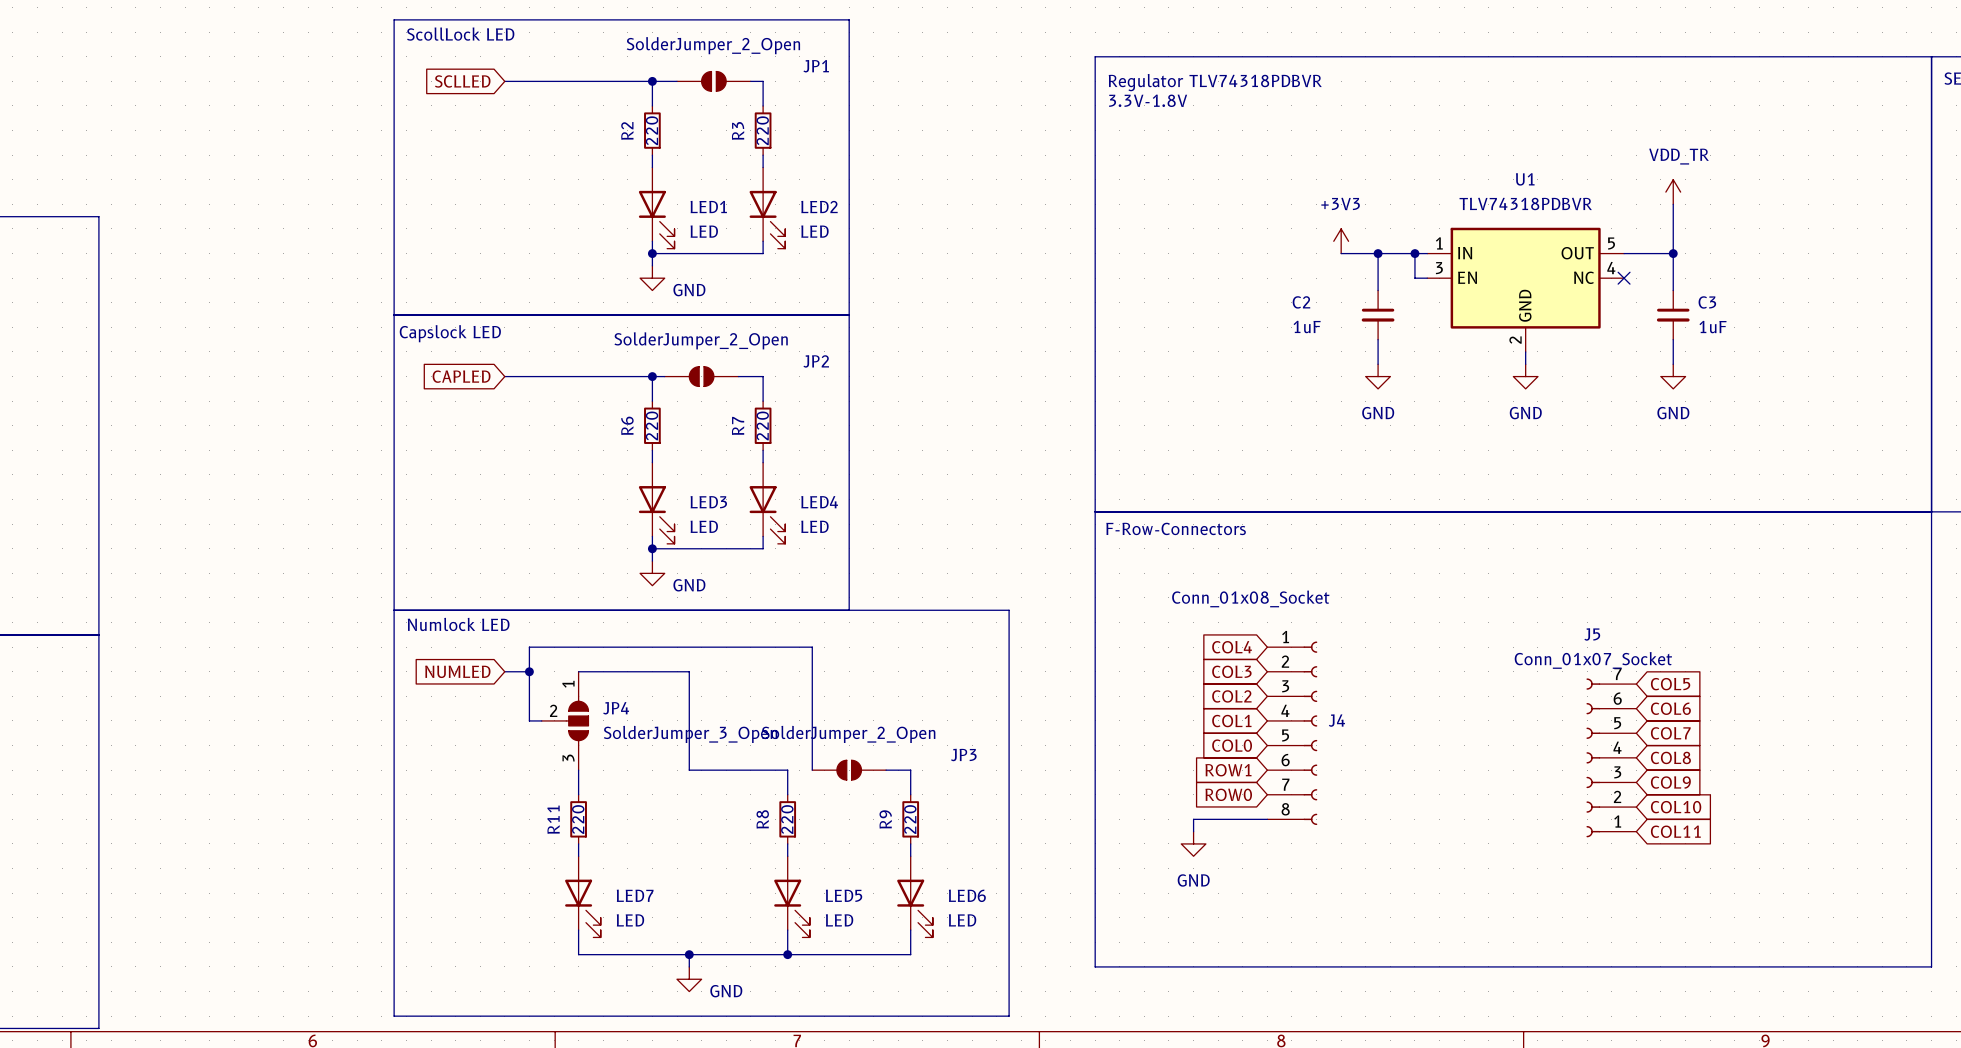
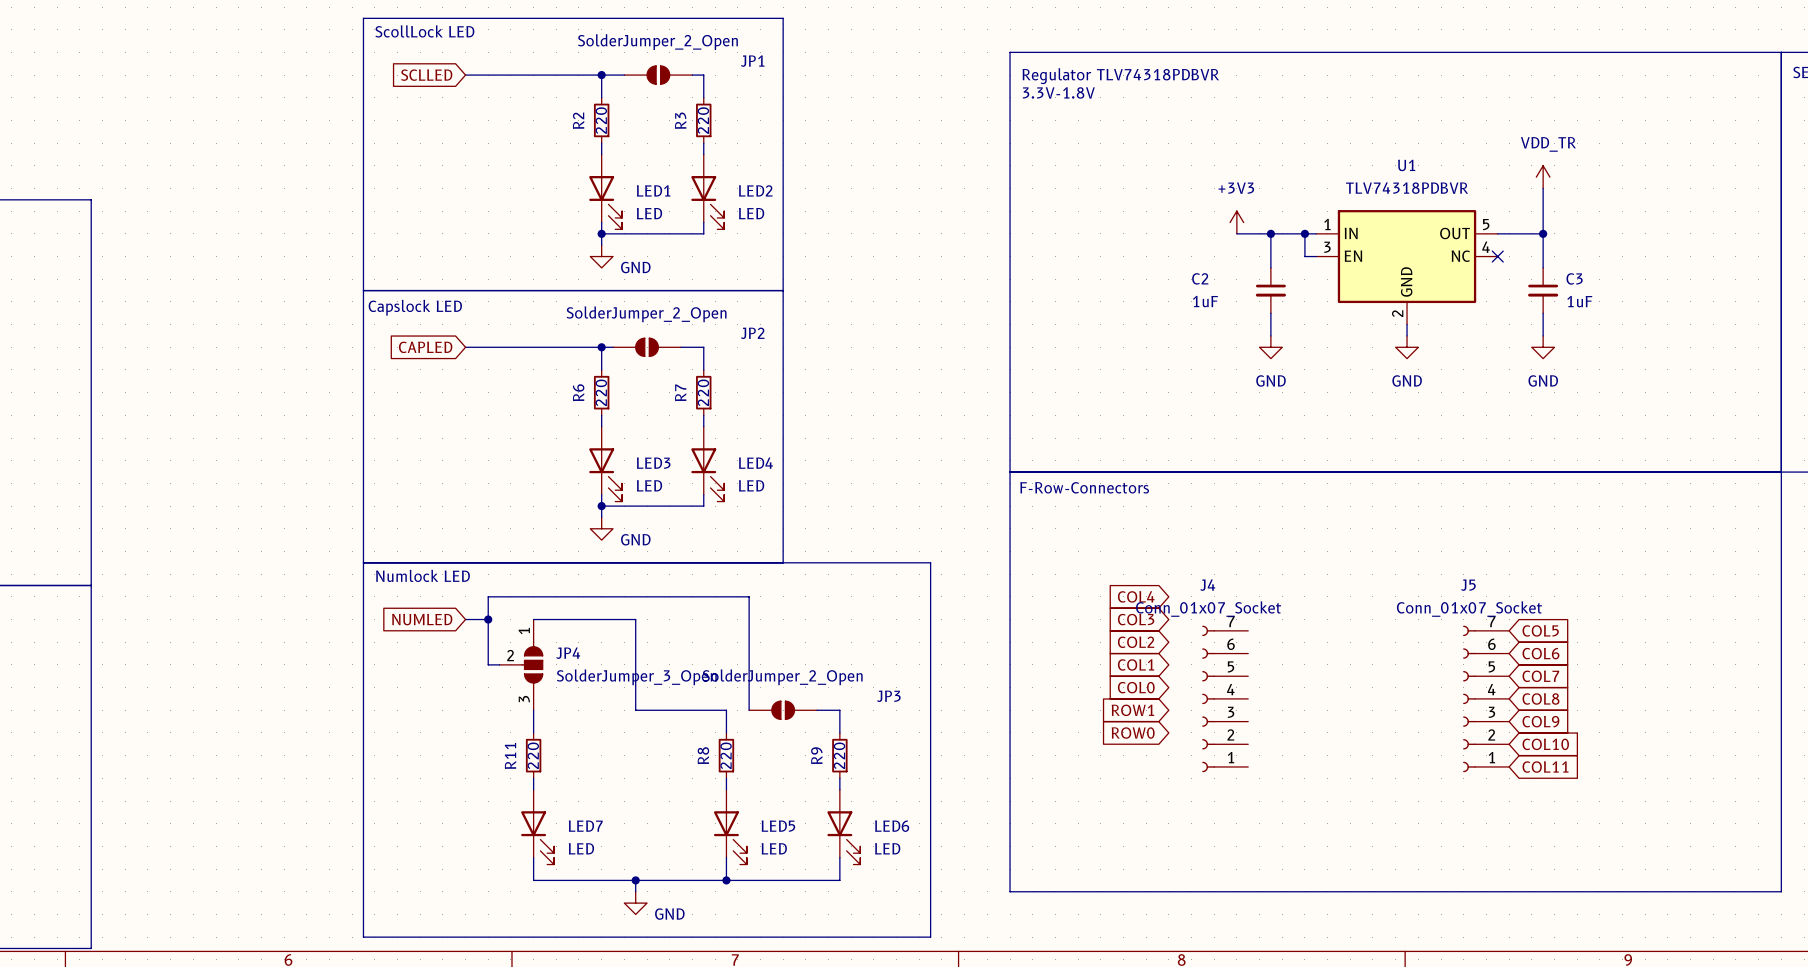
J4 value: Conn_01x08_Socket (1250, 598) -> Conn_01x07_Socket (1208, 609)
J4 symbol: [1267, 641, 1318, 826] -> [1202, 625, 1249, 773]
J4 name position: J4 (1336, 720) -> J4 (1207, 585)
wire: (1267, 819) (1193, 819) (1193, 831) -> none
power symbol: GND (1193, 843) -> none

